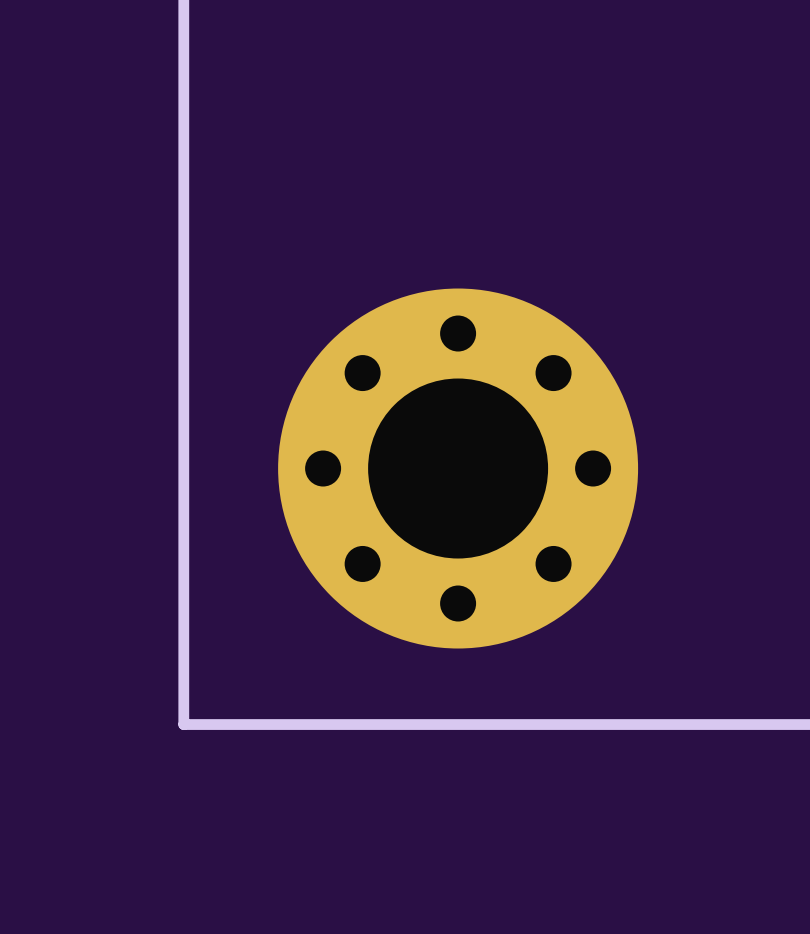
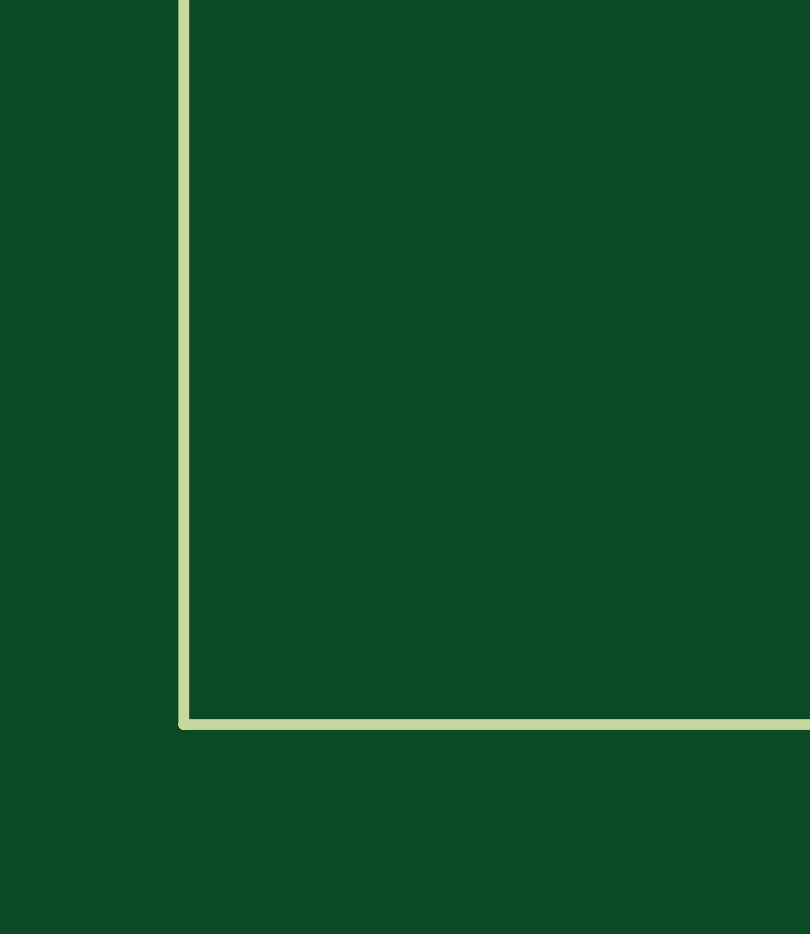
part: (458, 468) -> none

